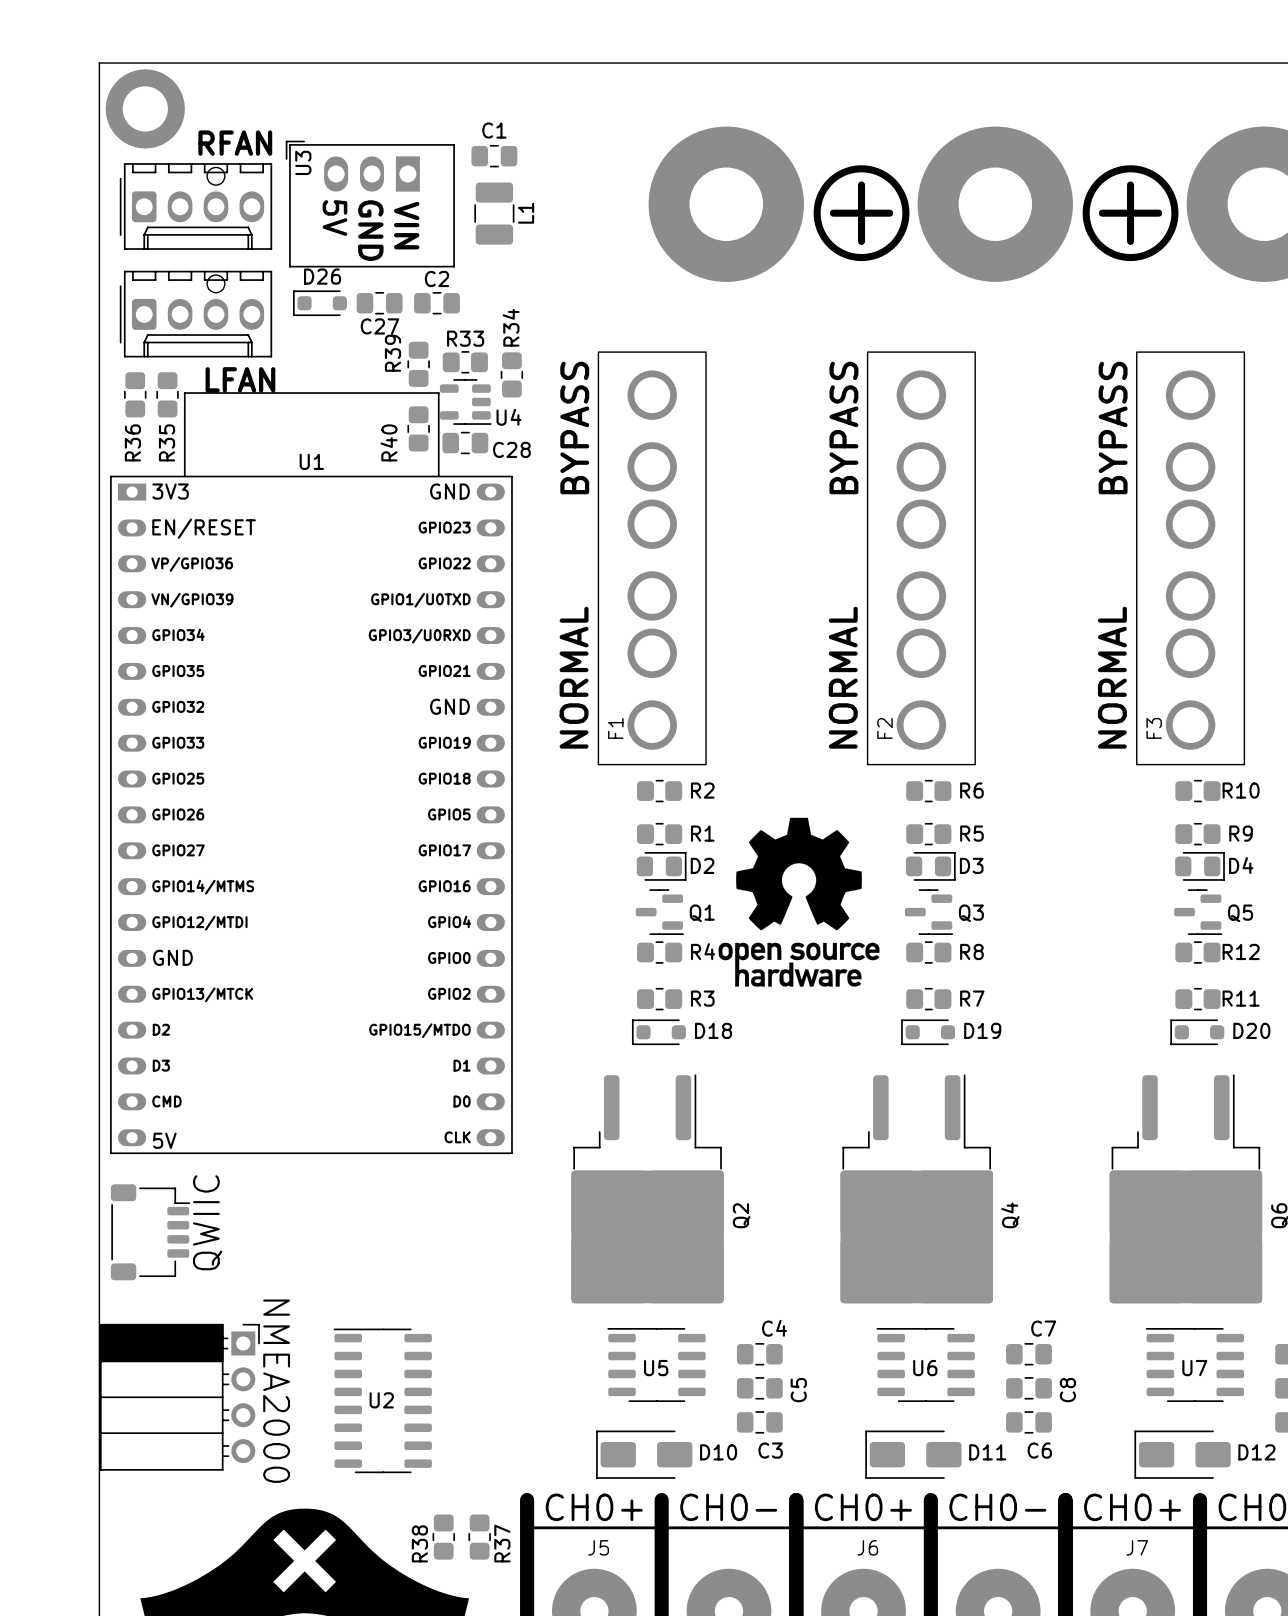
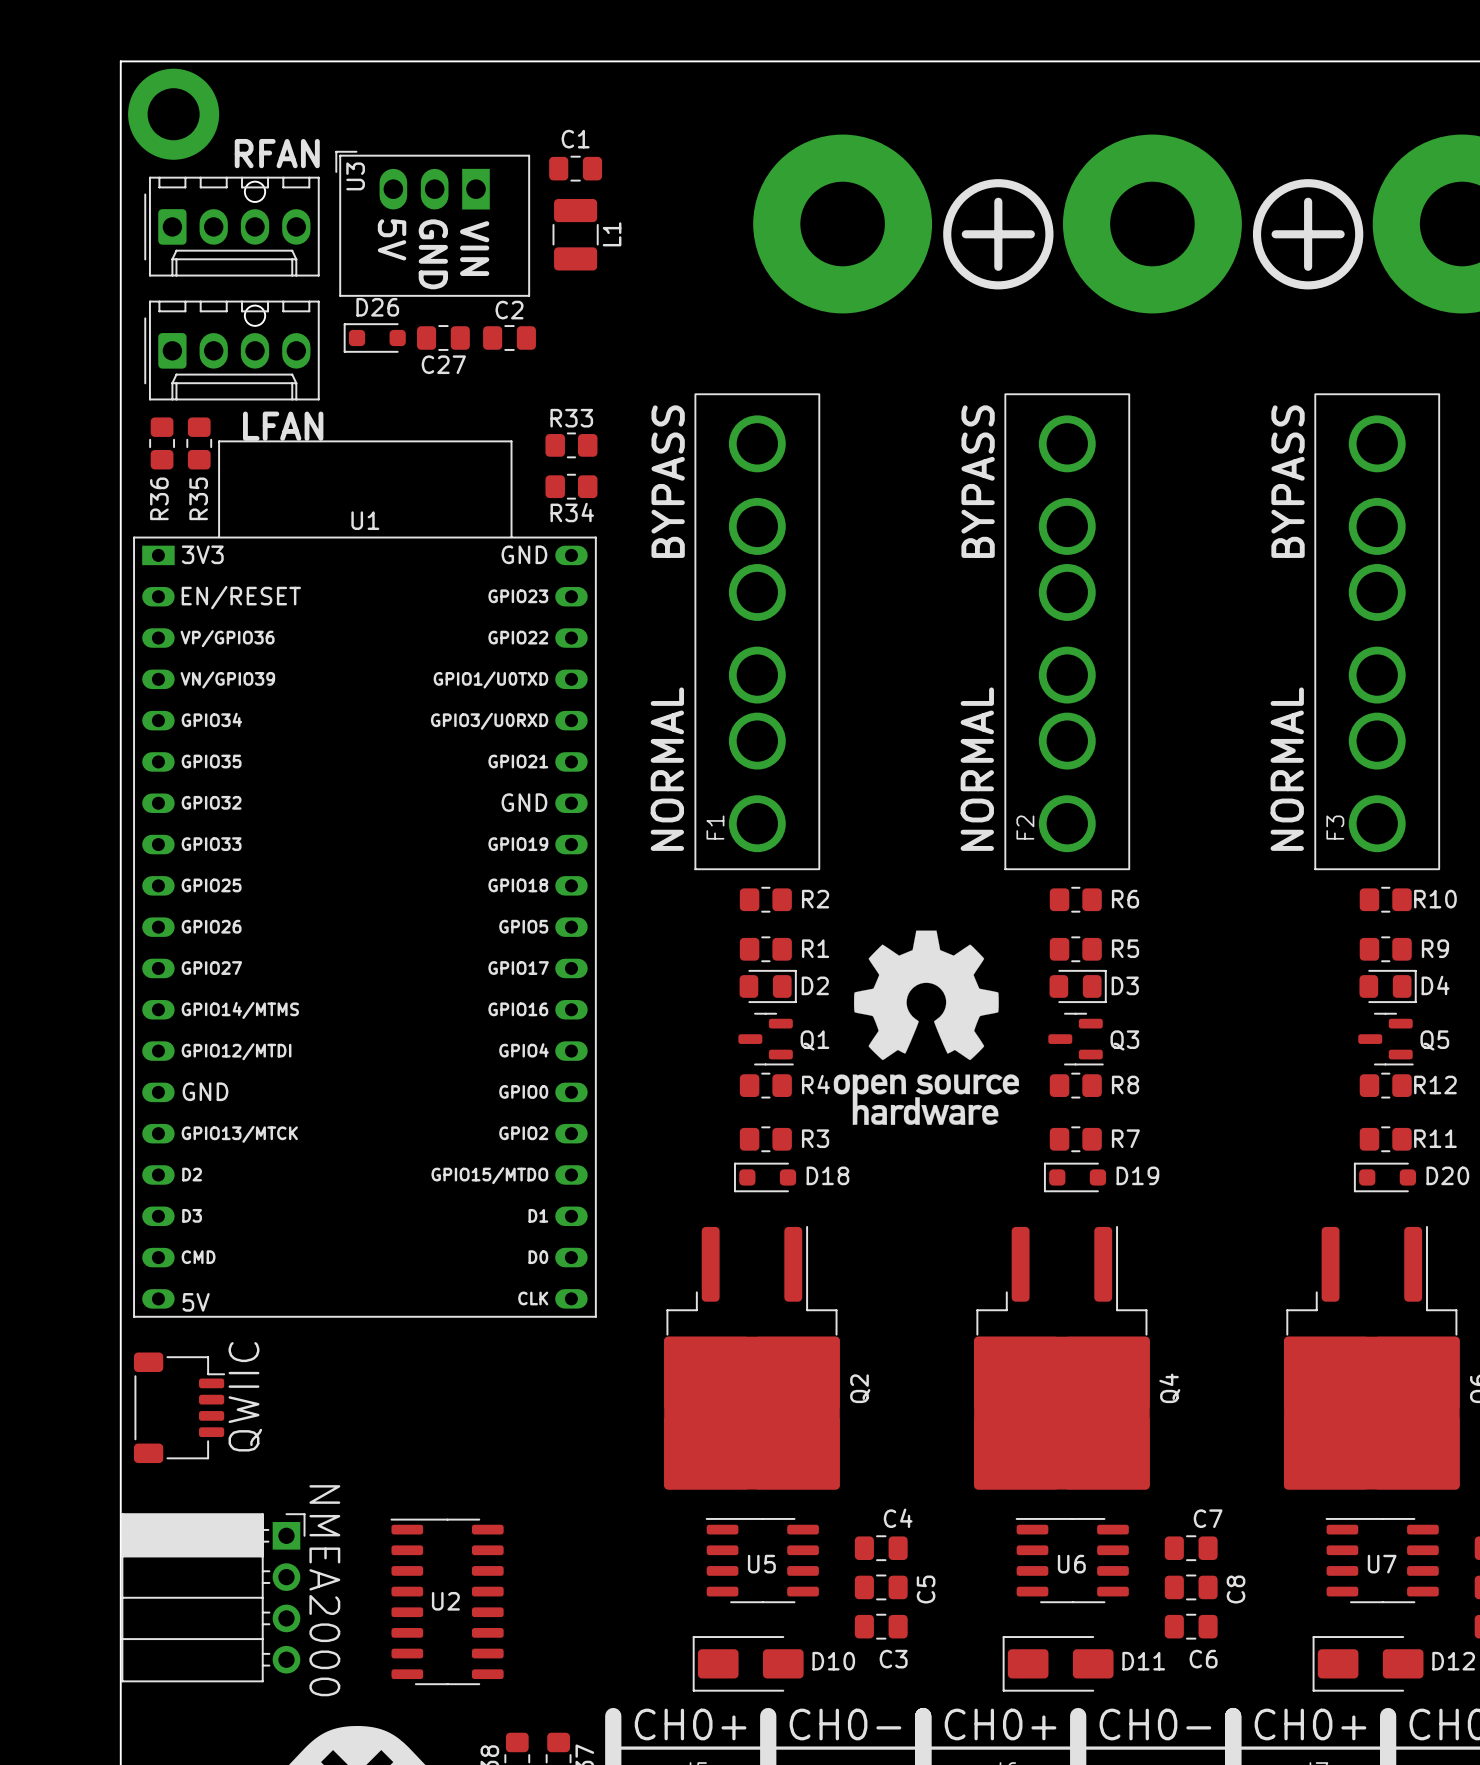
R34 name position: R34 (511, 327) -> R34 (572, 512)
R33 position: (465, 362) -> (571, 445)
R39: (418, 364) -> none
R34 rotation: 0° (511, 374) -> 90° clockwise (571, 486)
R34 position: (511, 374) -> (571, 486)
U4: (465, 402) -> none
R40: (418, 428) -> none
C28: (465, 443) -> none

